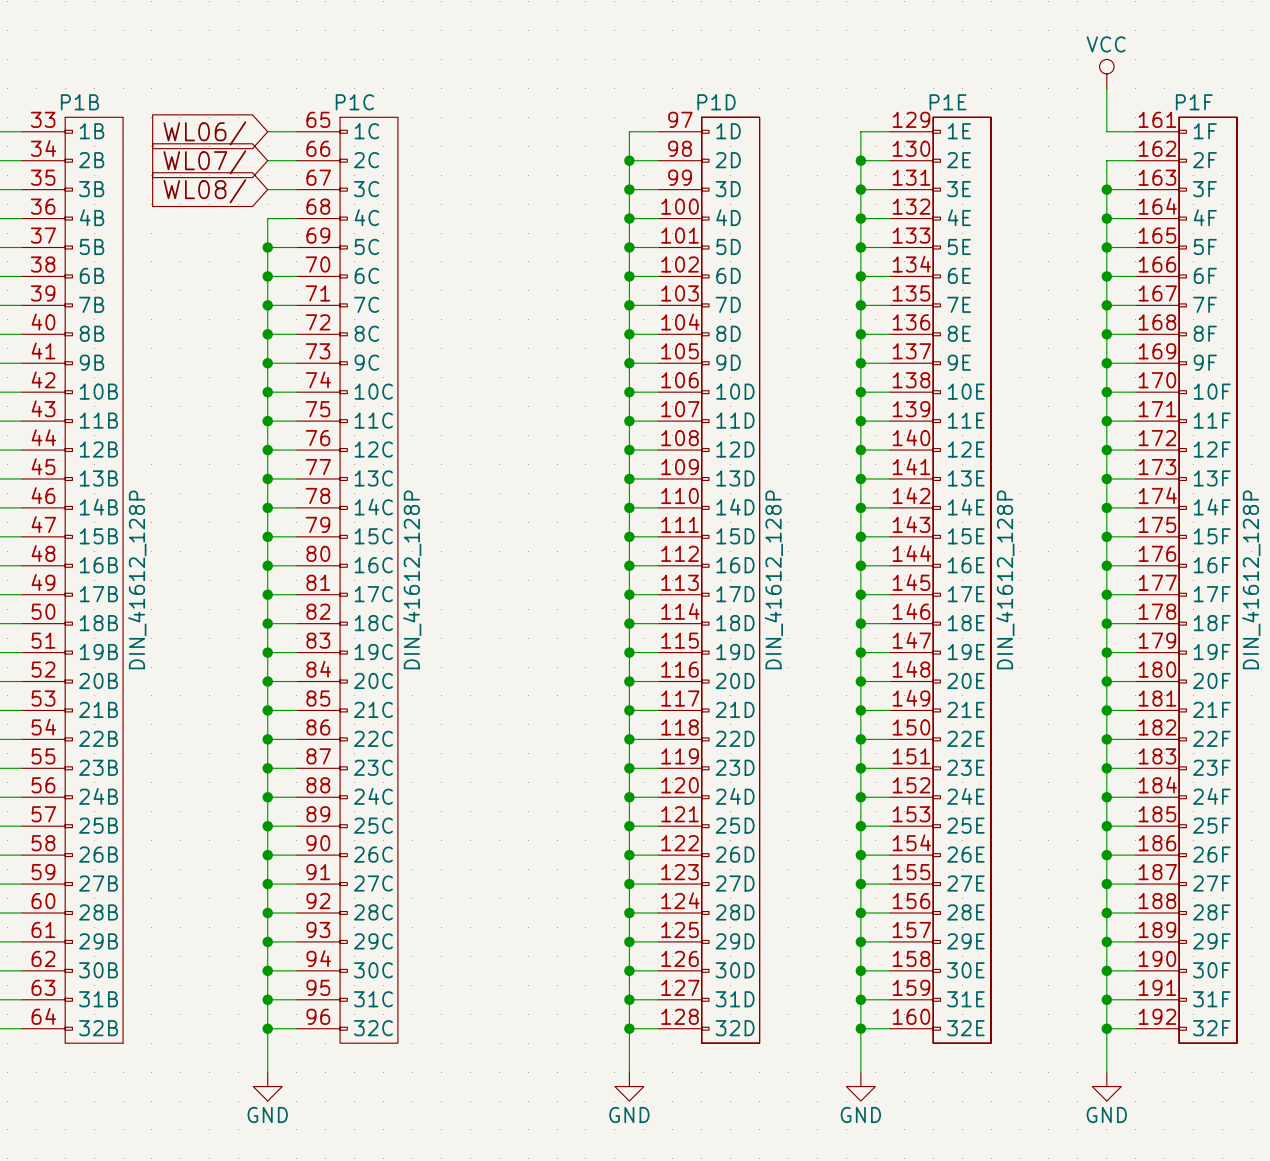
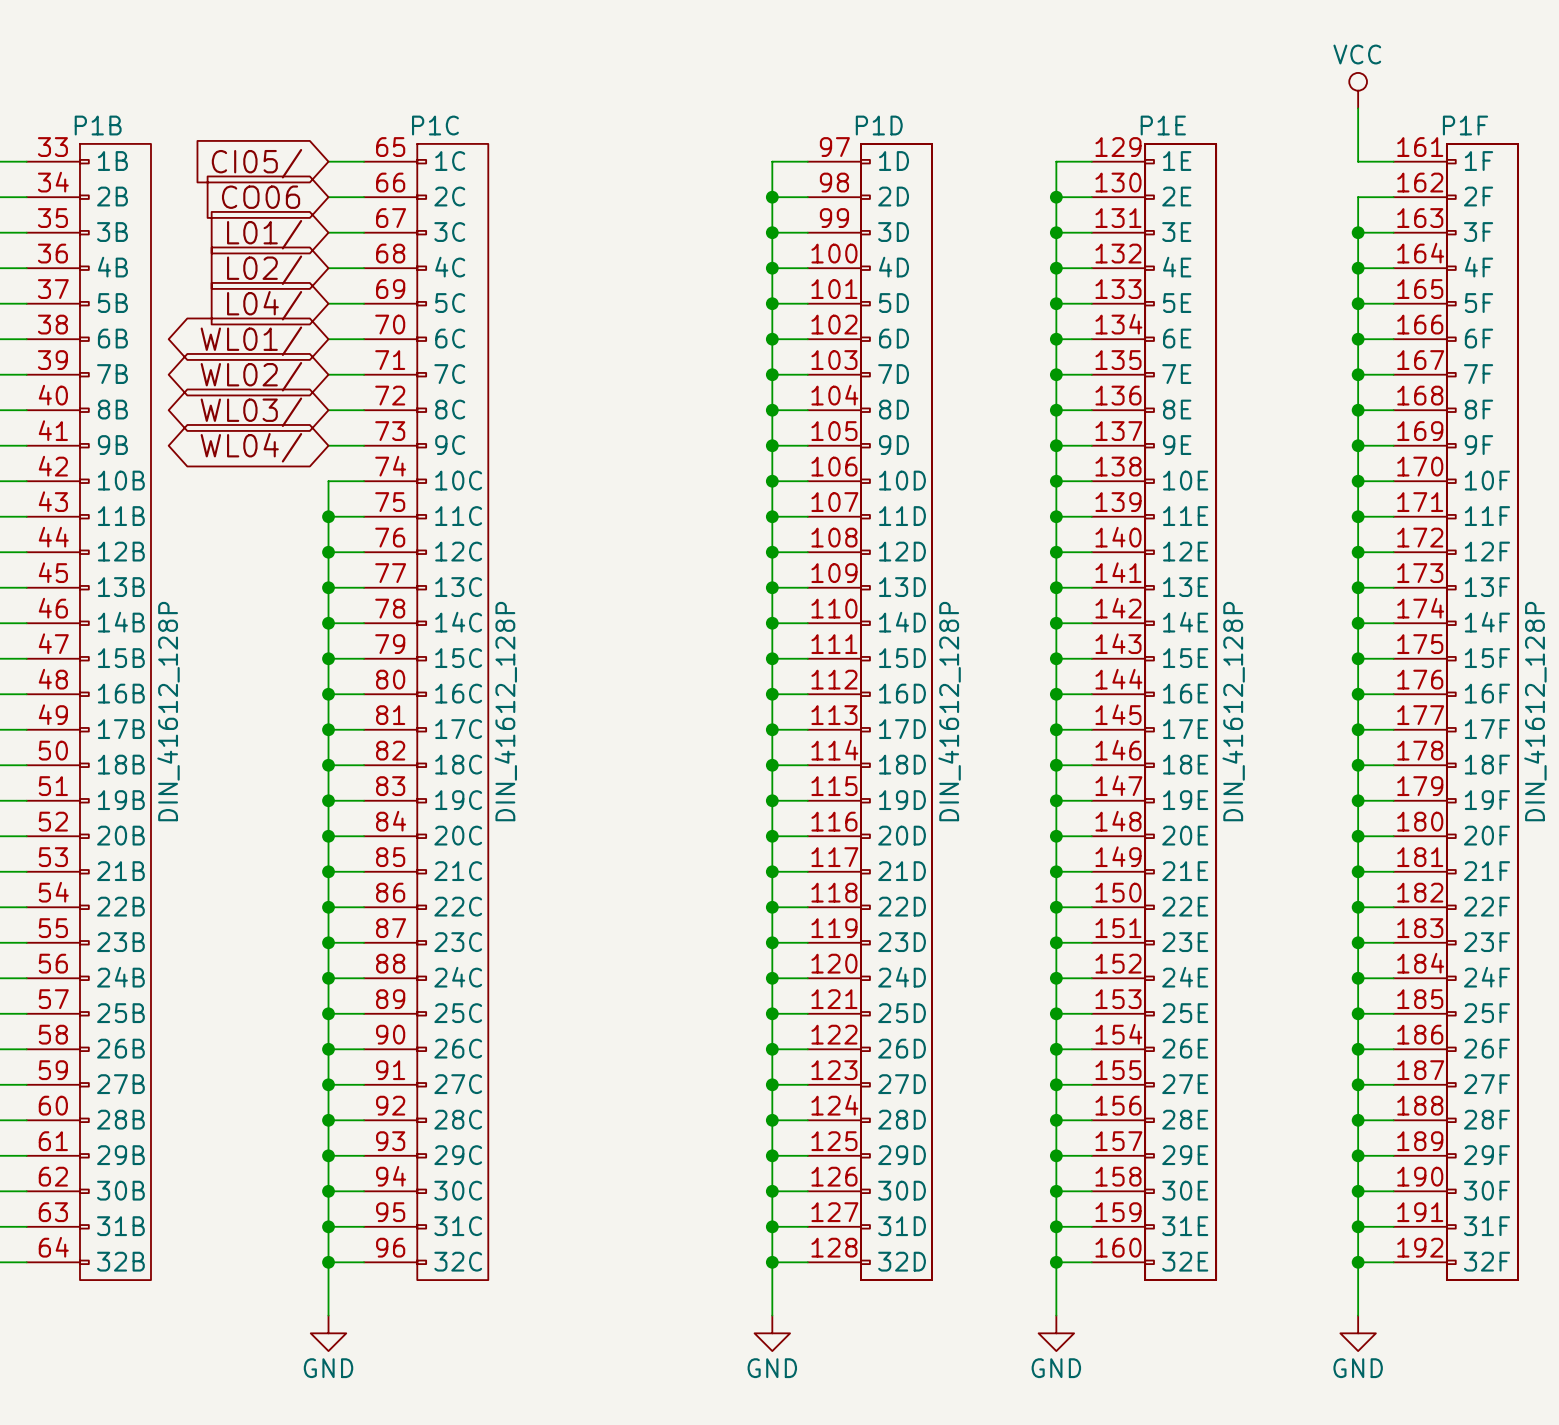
global label: WL06/ (204, 133) -> CI05/ (256, 163)
global label: WL07/ (204, 162) -> CO06 (261, 197)
global label: WL08/ (204, 191) -> L01/ (264, 234)
wire: (267, 218) (267, 392) -> none
global label: none -> L02/ (264, 270)
junction: (267, 247) -> none
global label: none -> L04/ (264, 305)
junction: (267, 276) -> none
global label: none -> WL01/ (251, 341)
junction: (267, 305) -> none
global label: none -> WL02/ (251, 376)
junction: (267, 334) -> none
global label: none -> WL03/ (251, 412)
junction: (267, 363) -> none
global label: none -> WL04/ (251, 447)
junction: (267, 392) -> none

